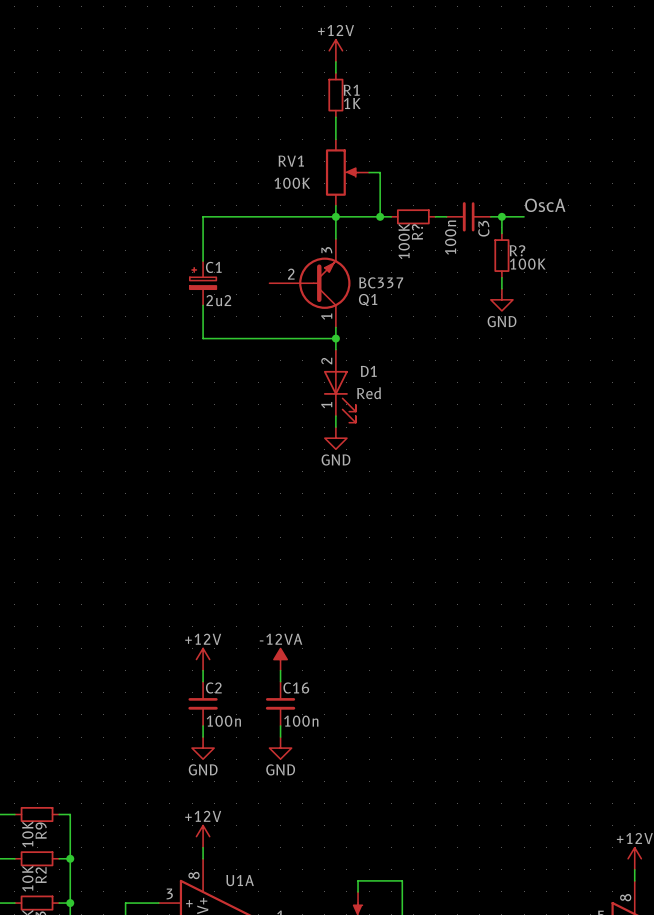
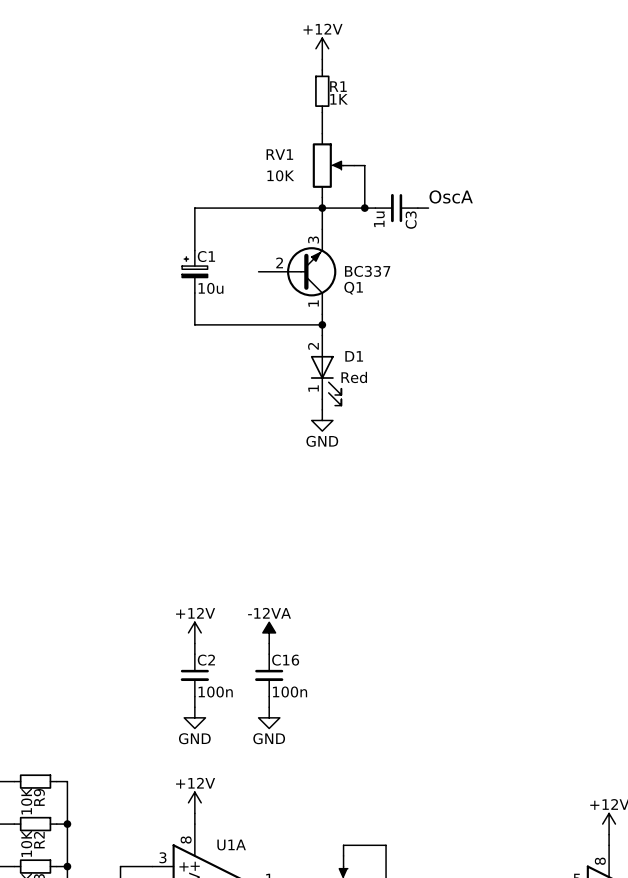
RV1 value: 100K (292, 183) -> 10K (280, 175)
label position: OscA (545, 205) -> OscA (451, 196)
R?: 100K (413, 216) -> none
C3 position: (468, 216) -> (396, 208)
wire: (490, 216) (524, 216) -> none
wire: (501, 216) (501, 233) -> none
junction: (501, 216) -> none
C3 value: 100n (450, 237) -> 1u (379, 219)
R?: 100K (501, 255) -> none
wire: (501, 277) (501, 288) -> none
power symbol: GND (501, 299) -> none
C1 value: 2u2 (218, 300) -> 10u (211, 288)

